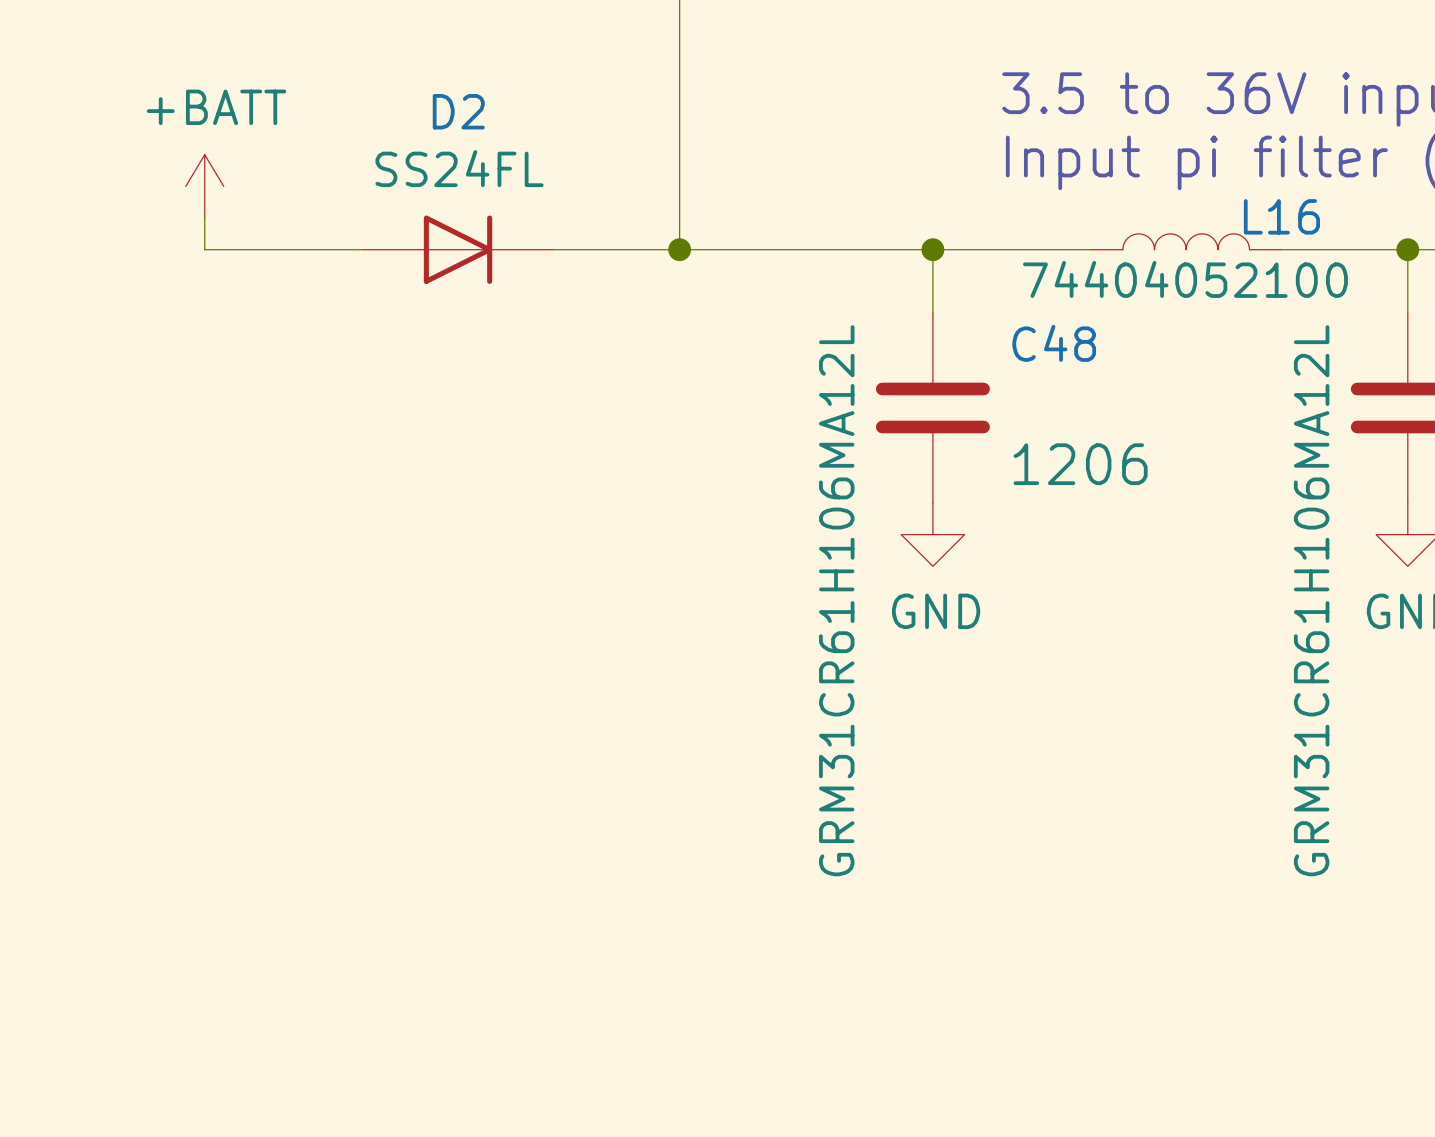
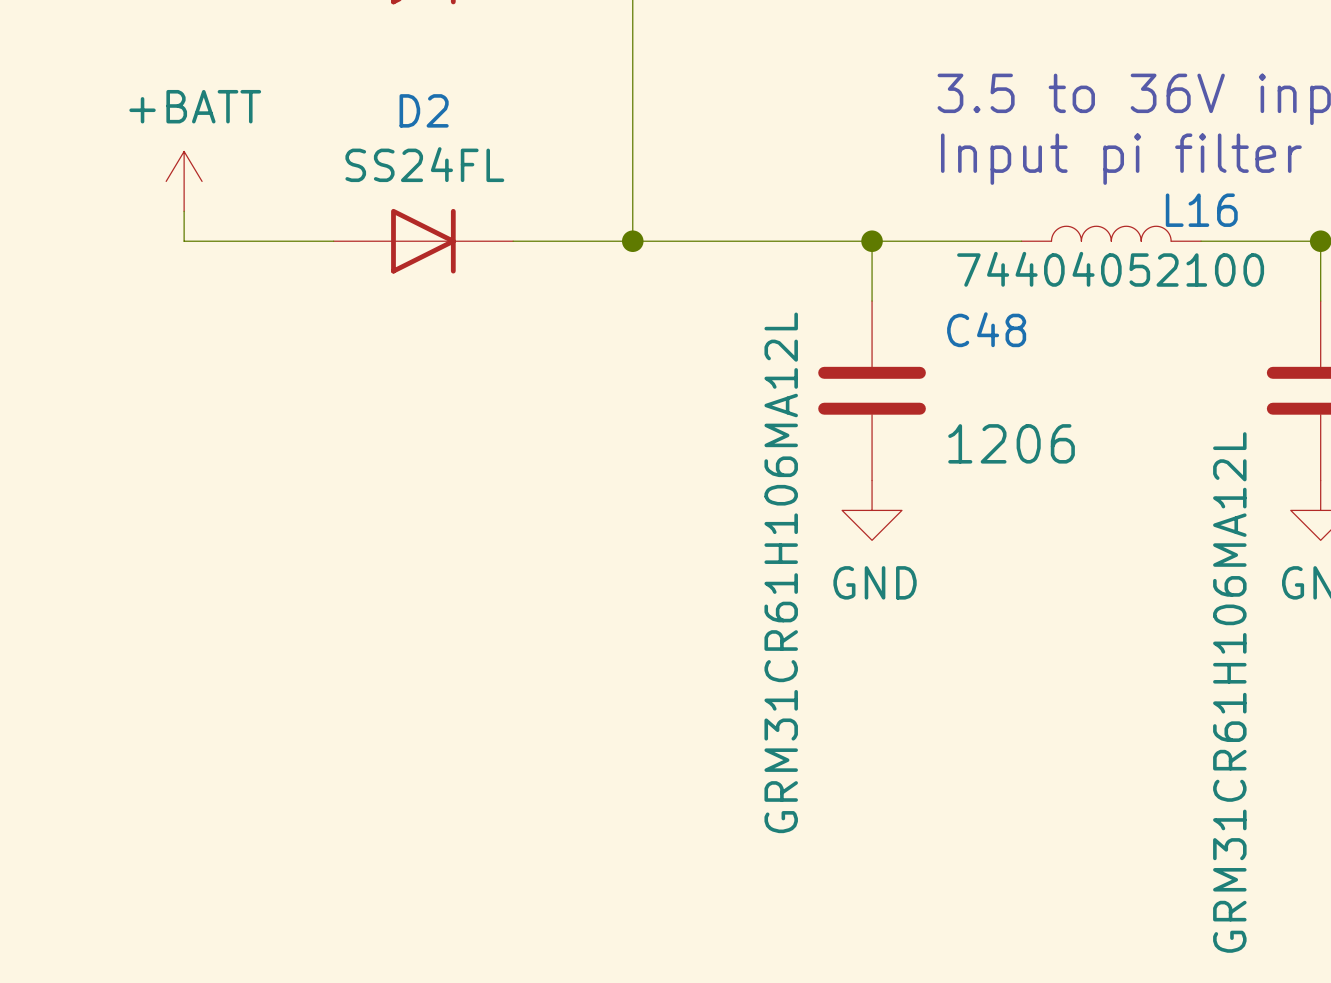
part value position: GRM31CR61H106MA12L (1311, 600) -> GRM31CR61H106MA12L (1229, 692)

